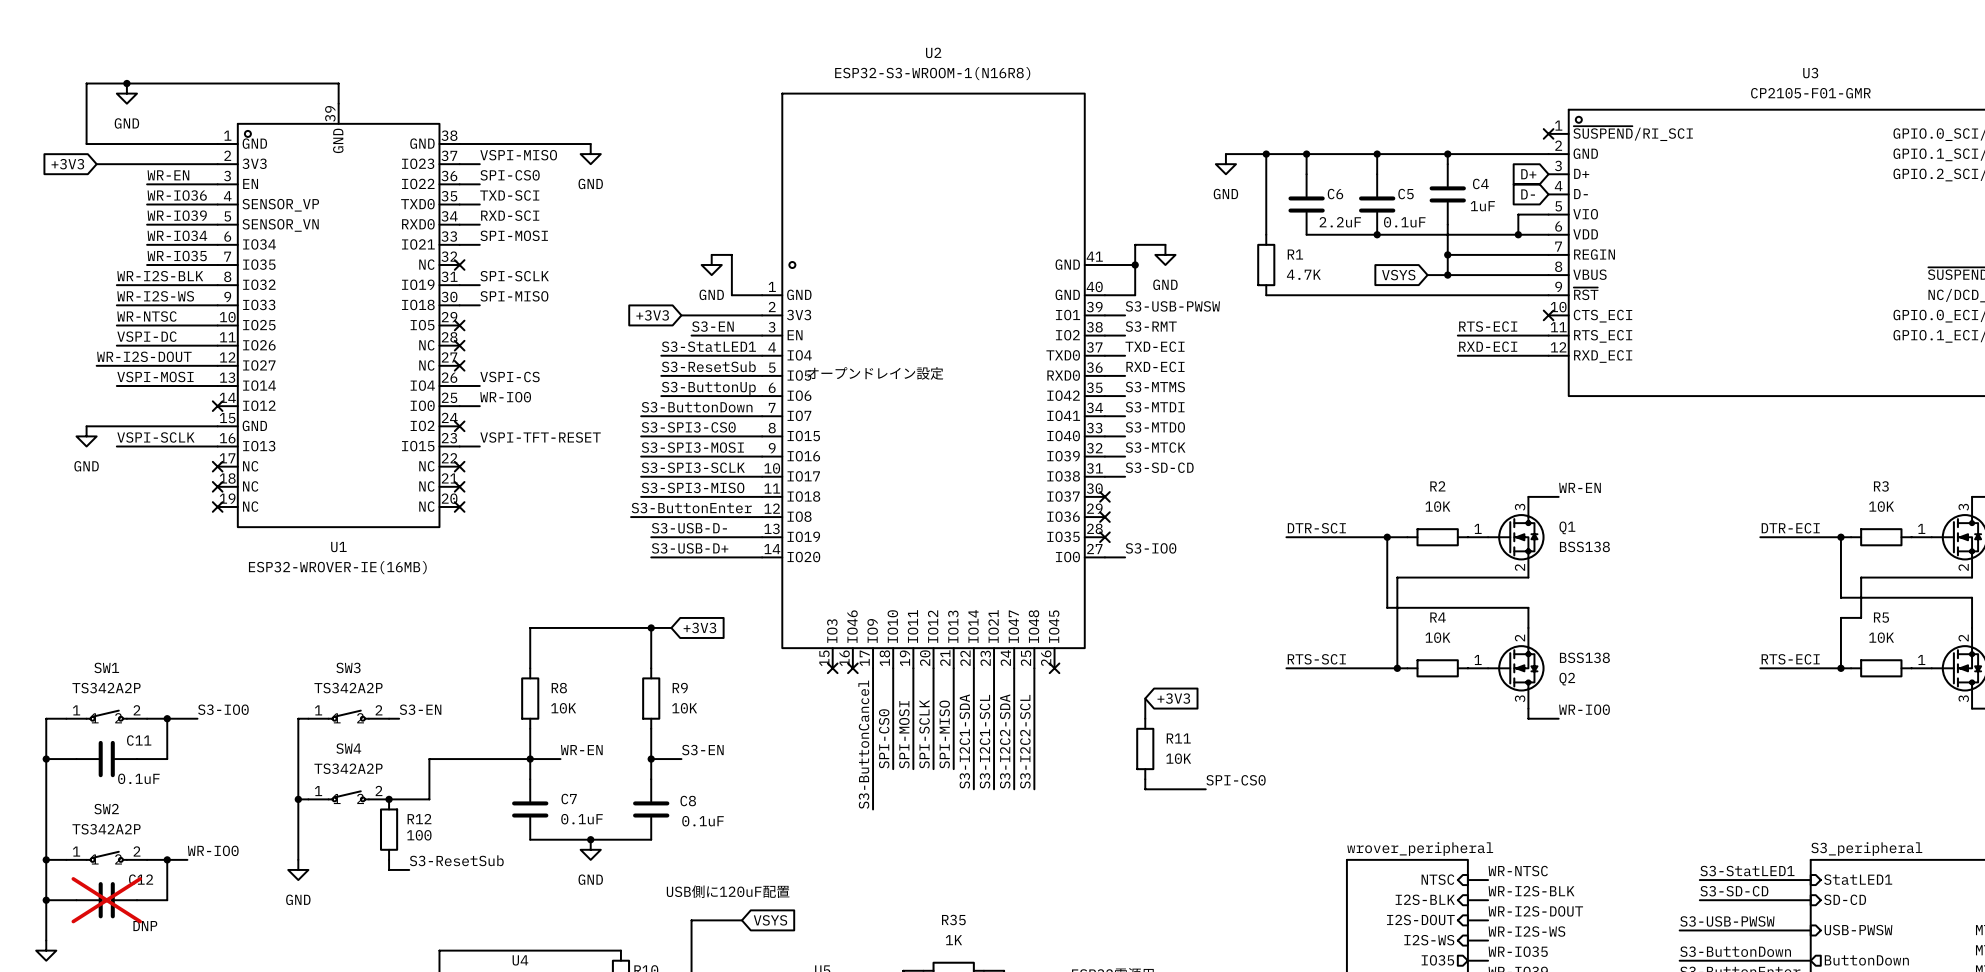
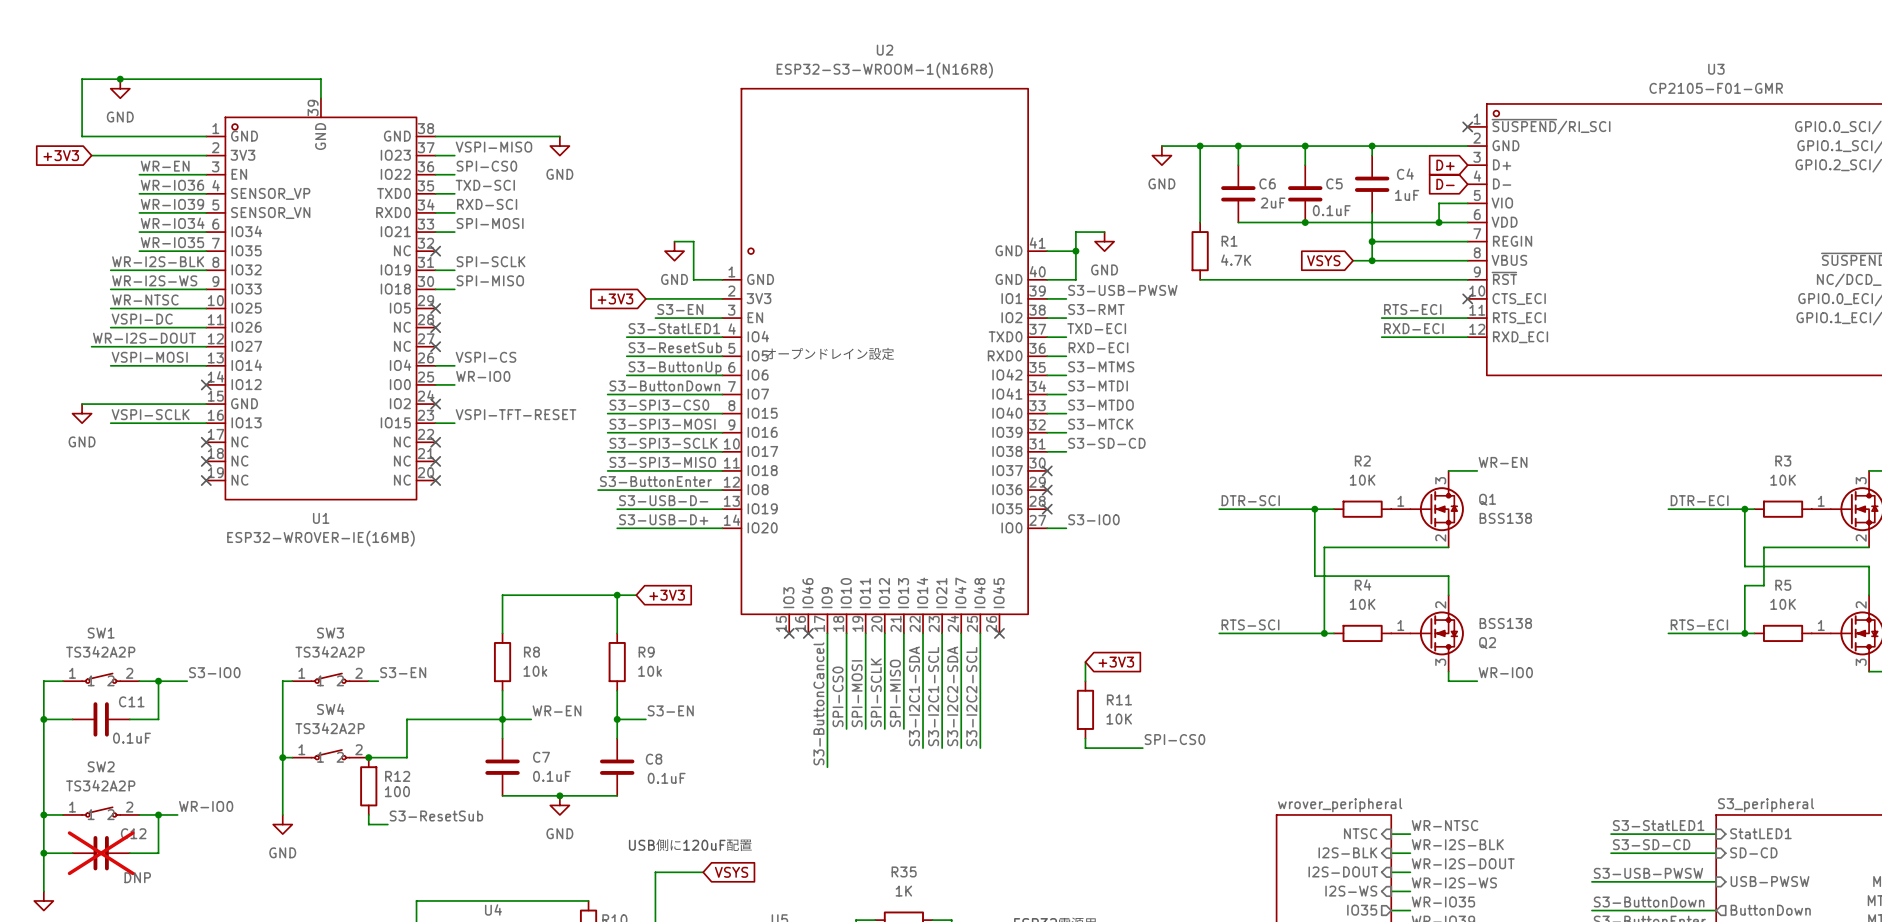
C6 value: 2.2uF (1340, 222) -> 2uF (1273, 203)
R8 value: 10K (563, 708) -> 10k (535, 671)
R9 value: 10K (684, 708) -> 10k (650, 671)

